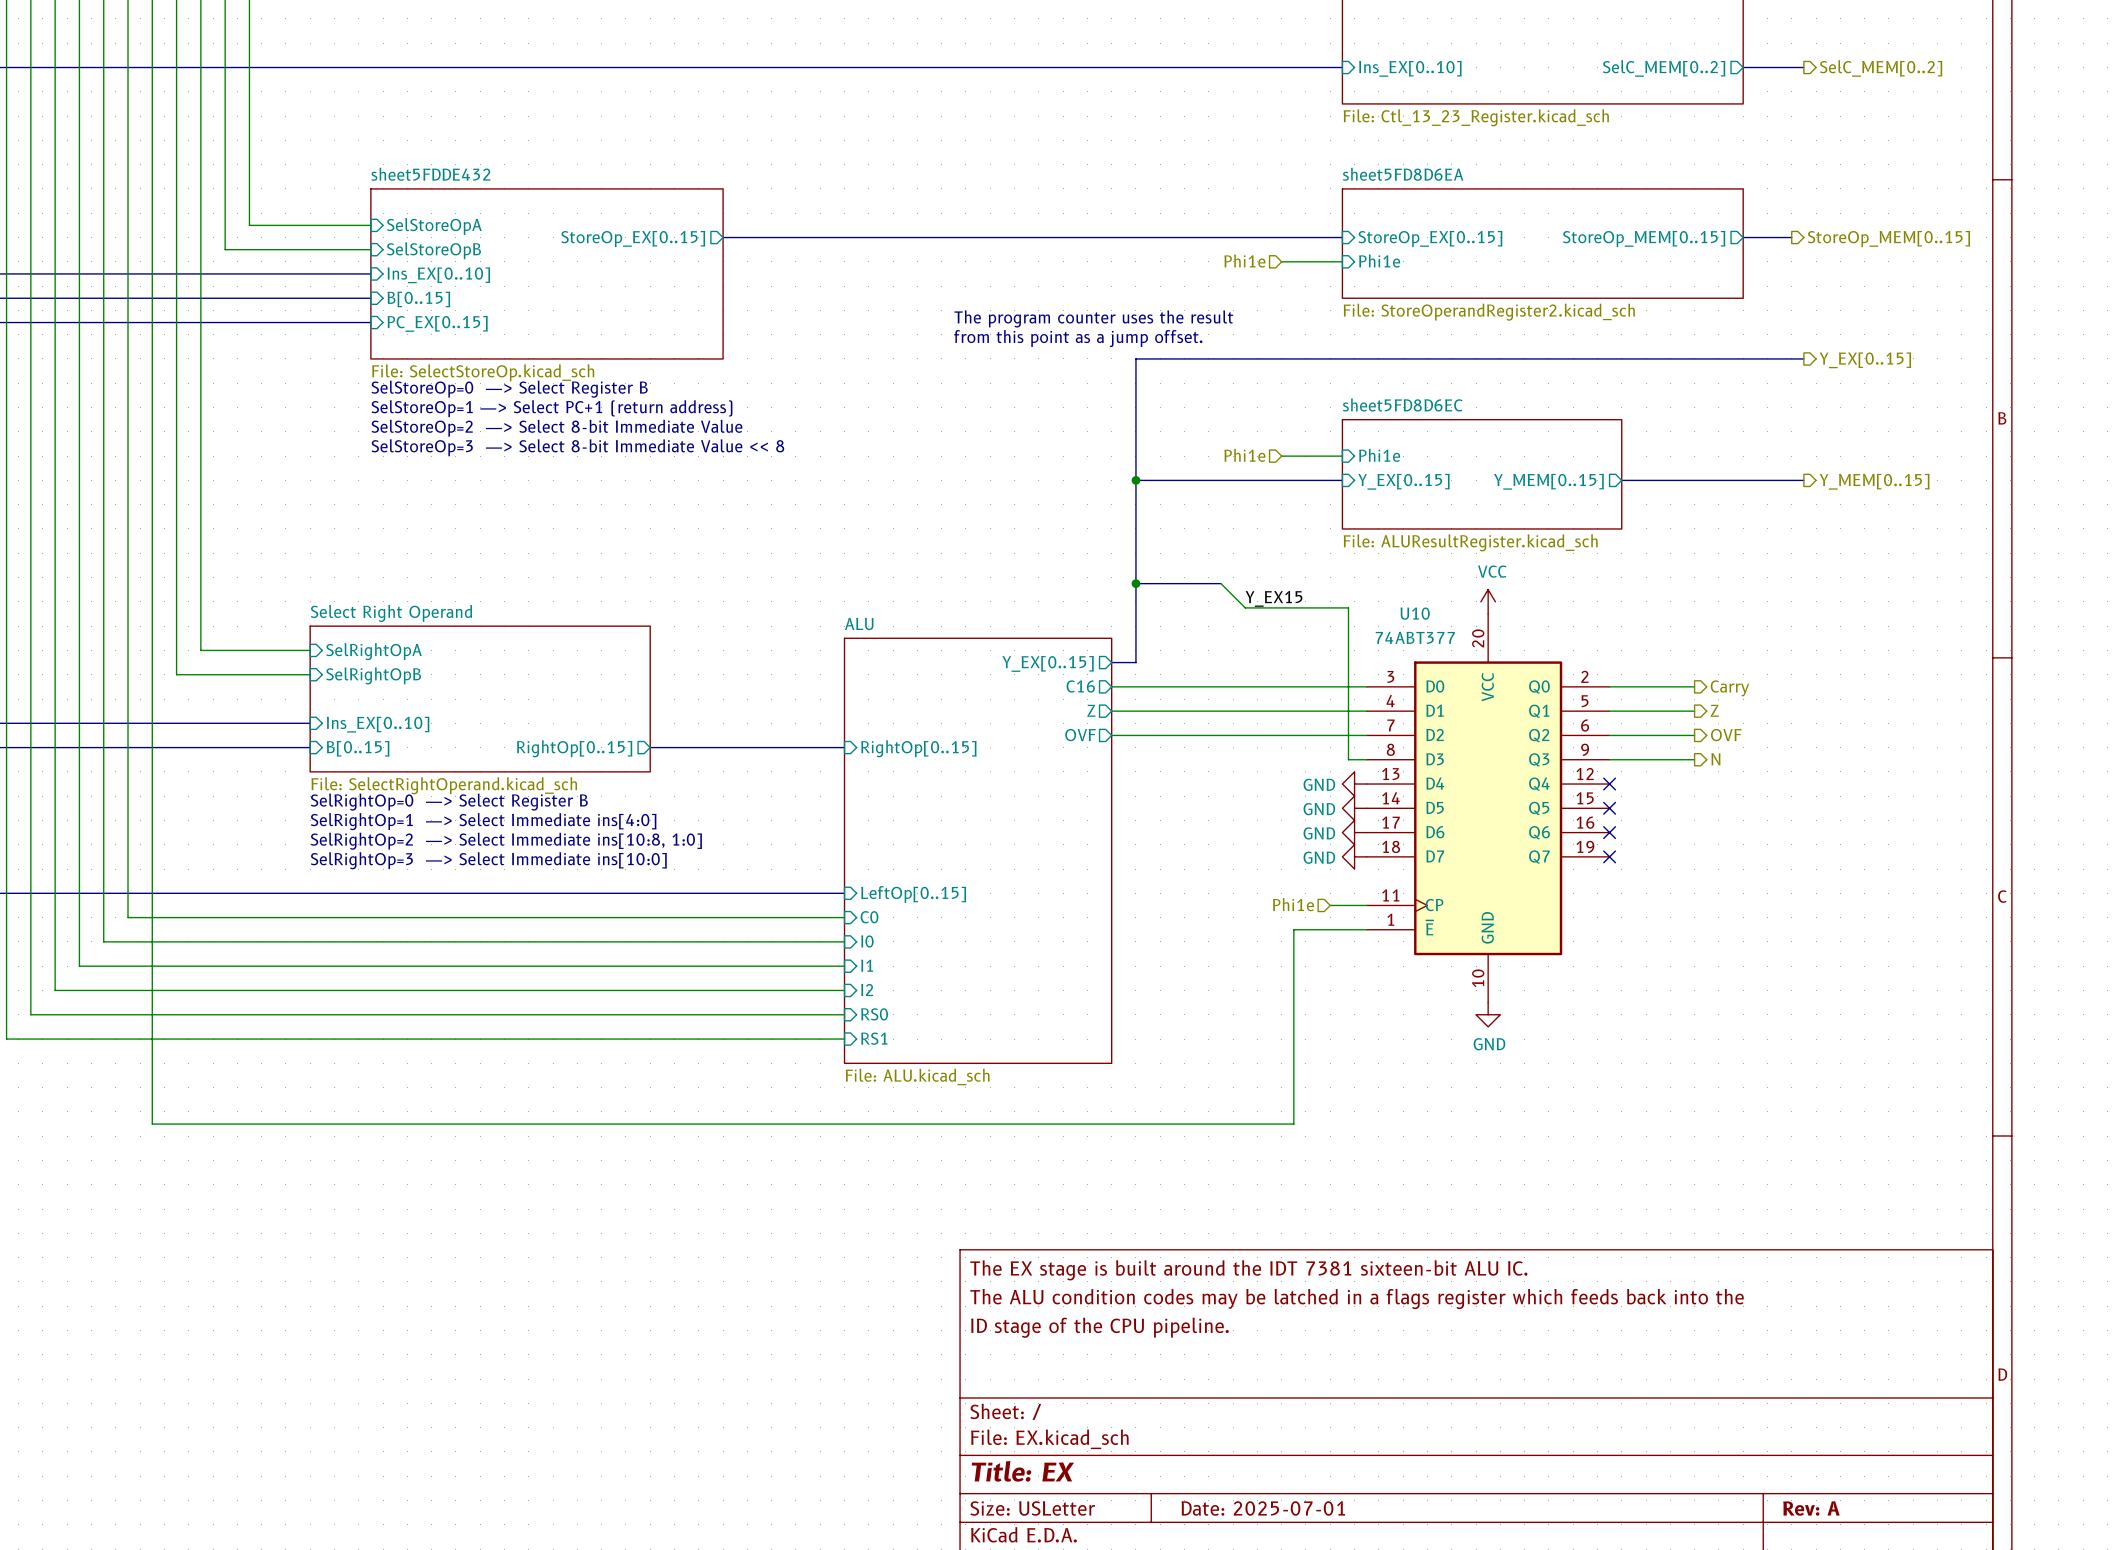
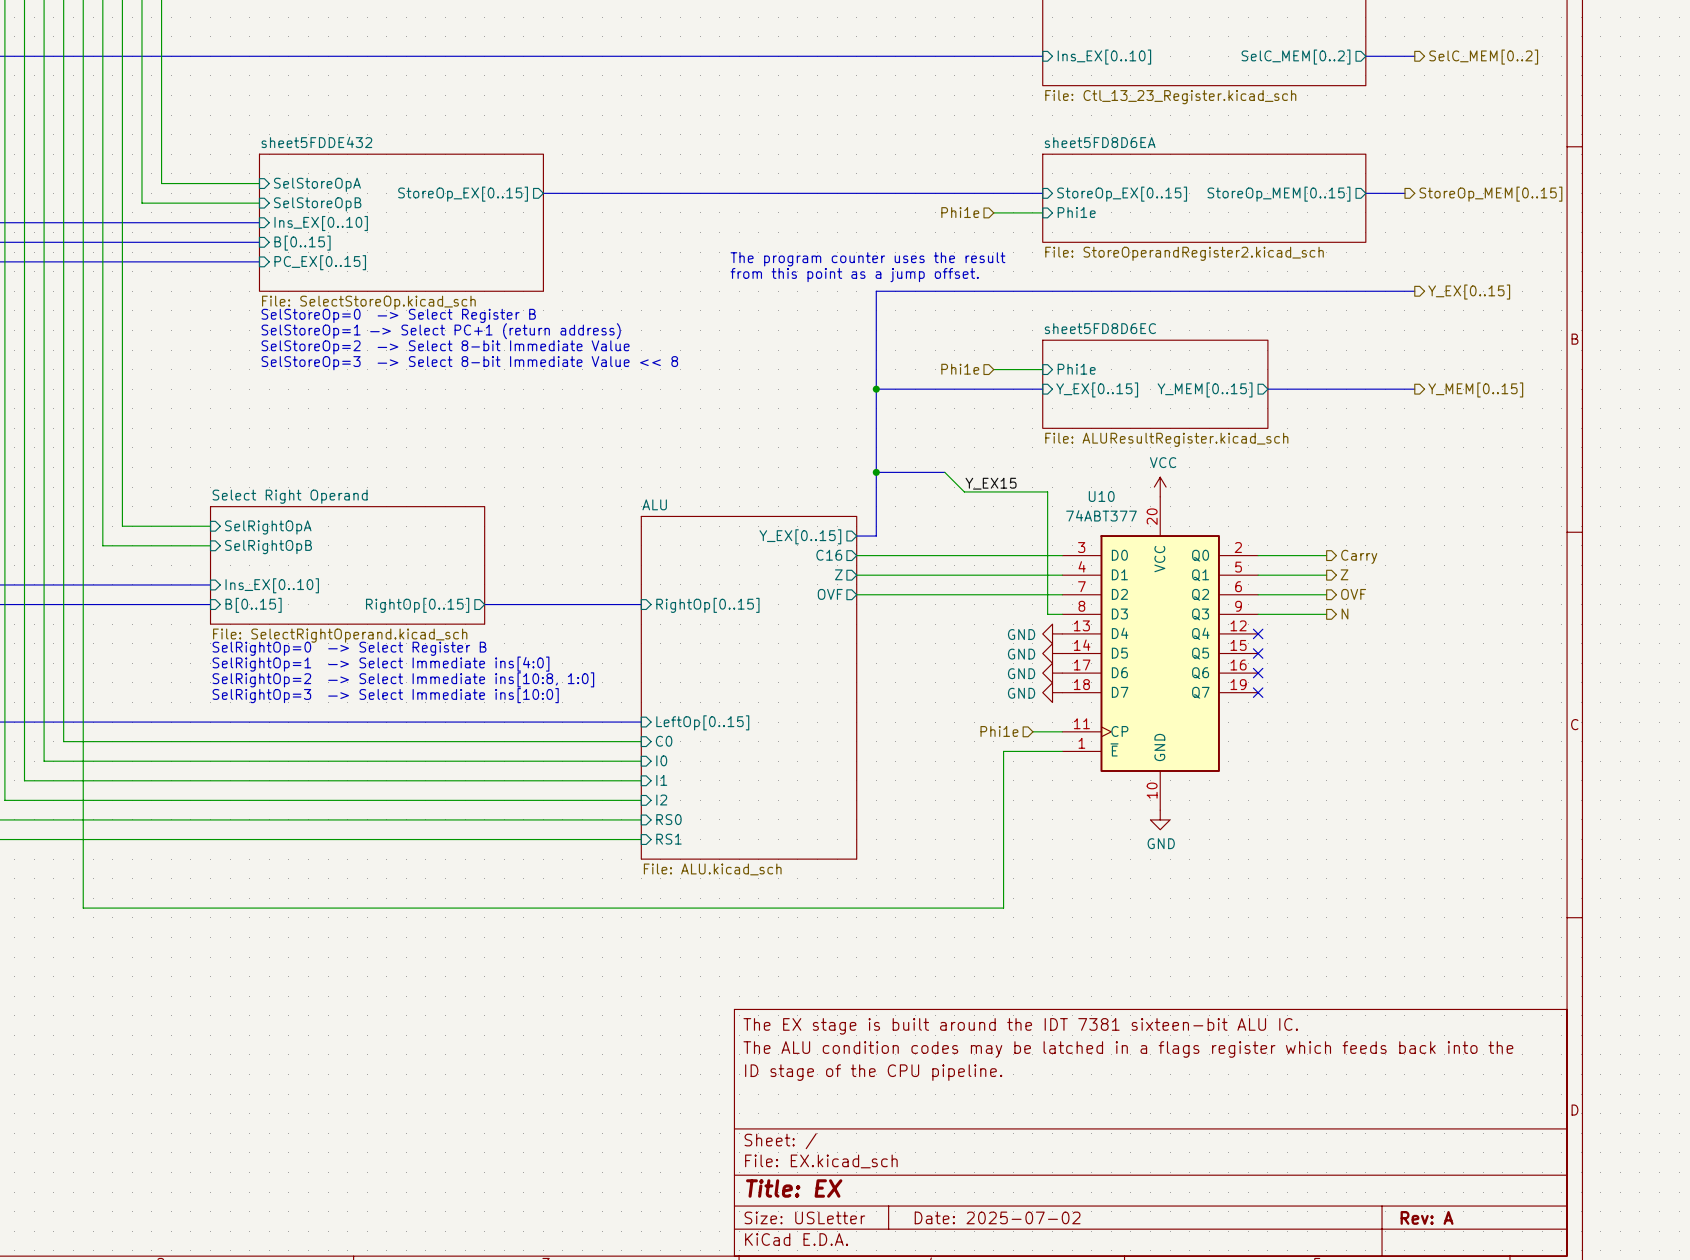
title block: Date: 2025-07-01 (1263, 1508) -> Date: 2025-07-02 (997, 1217)

